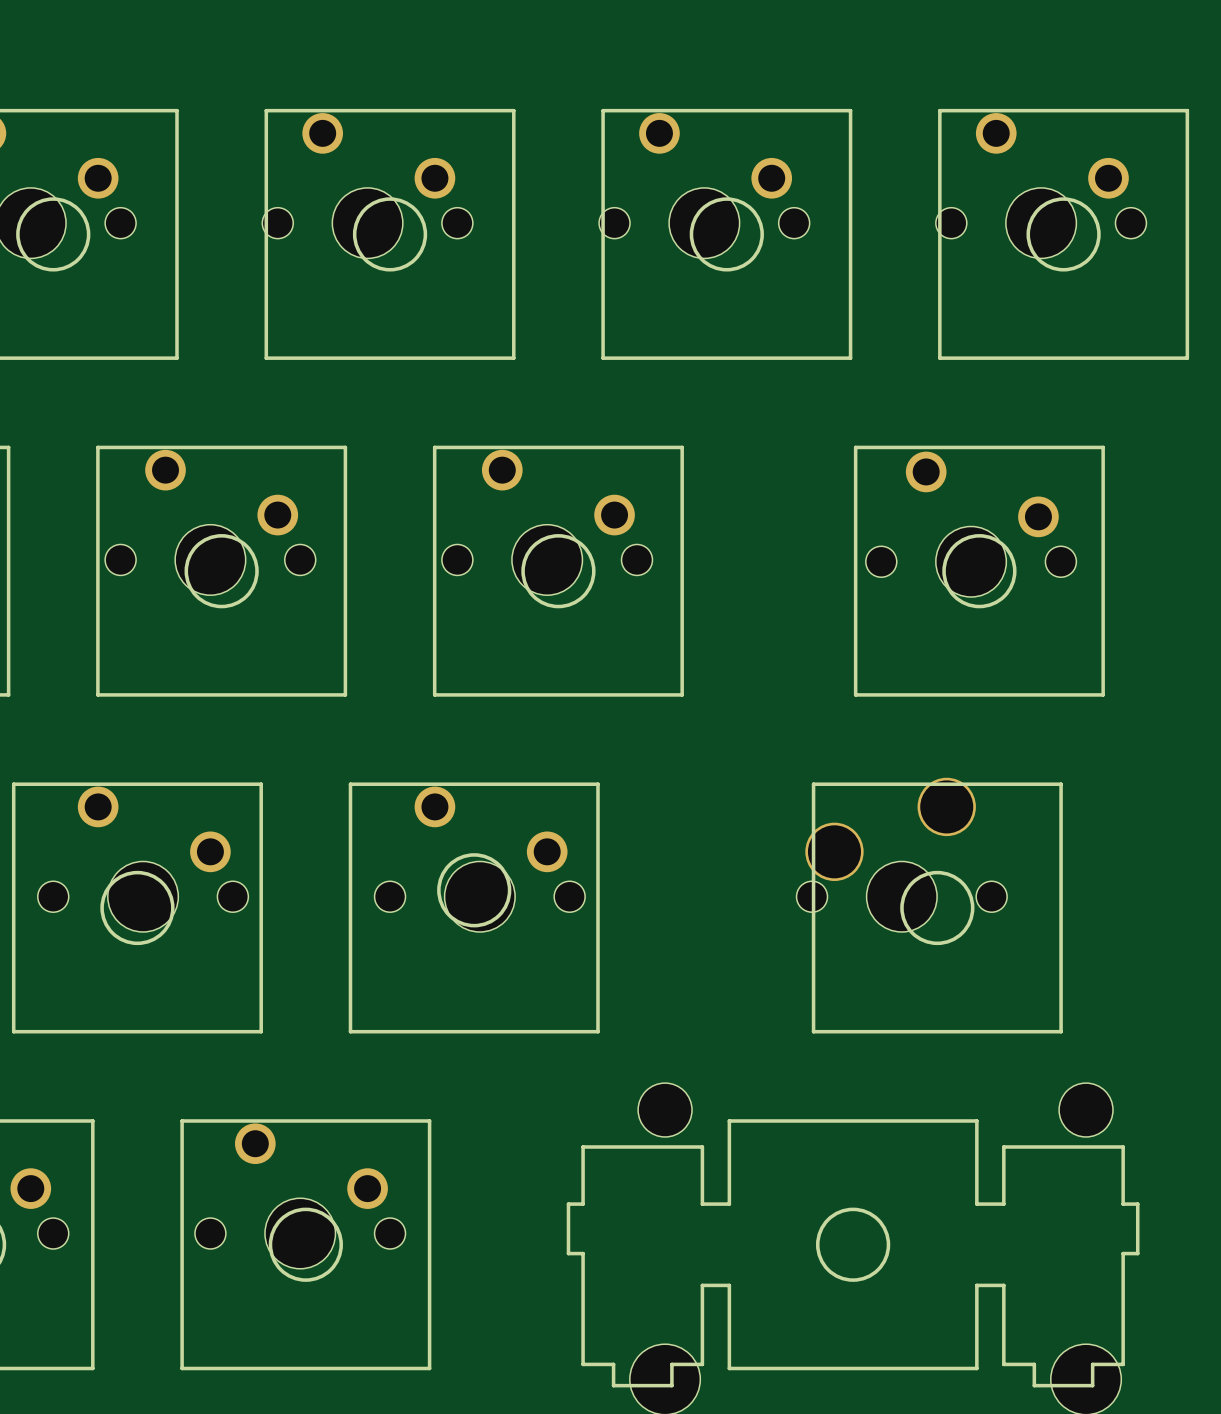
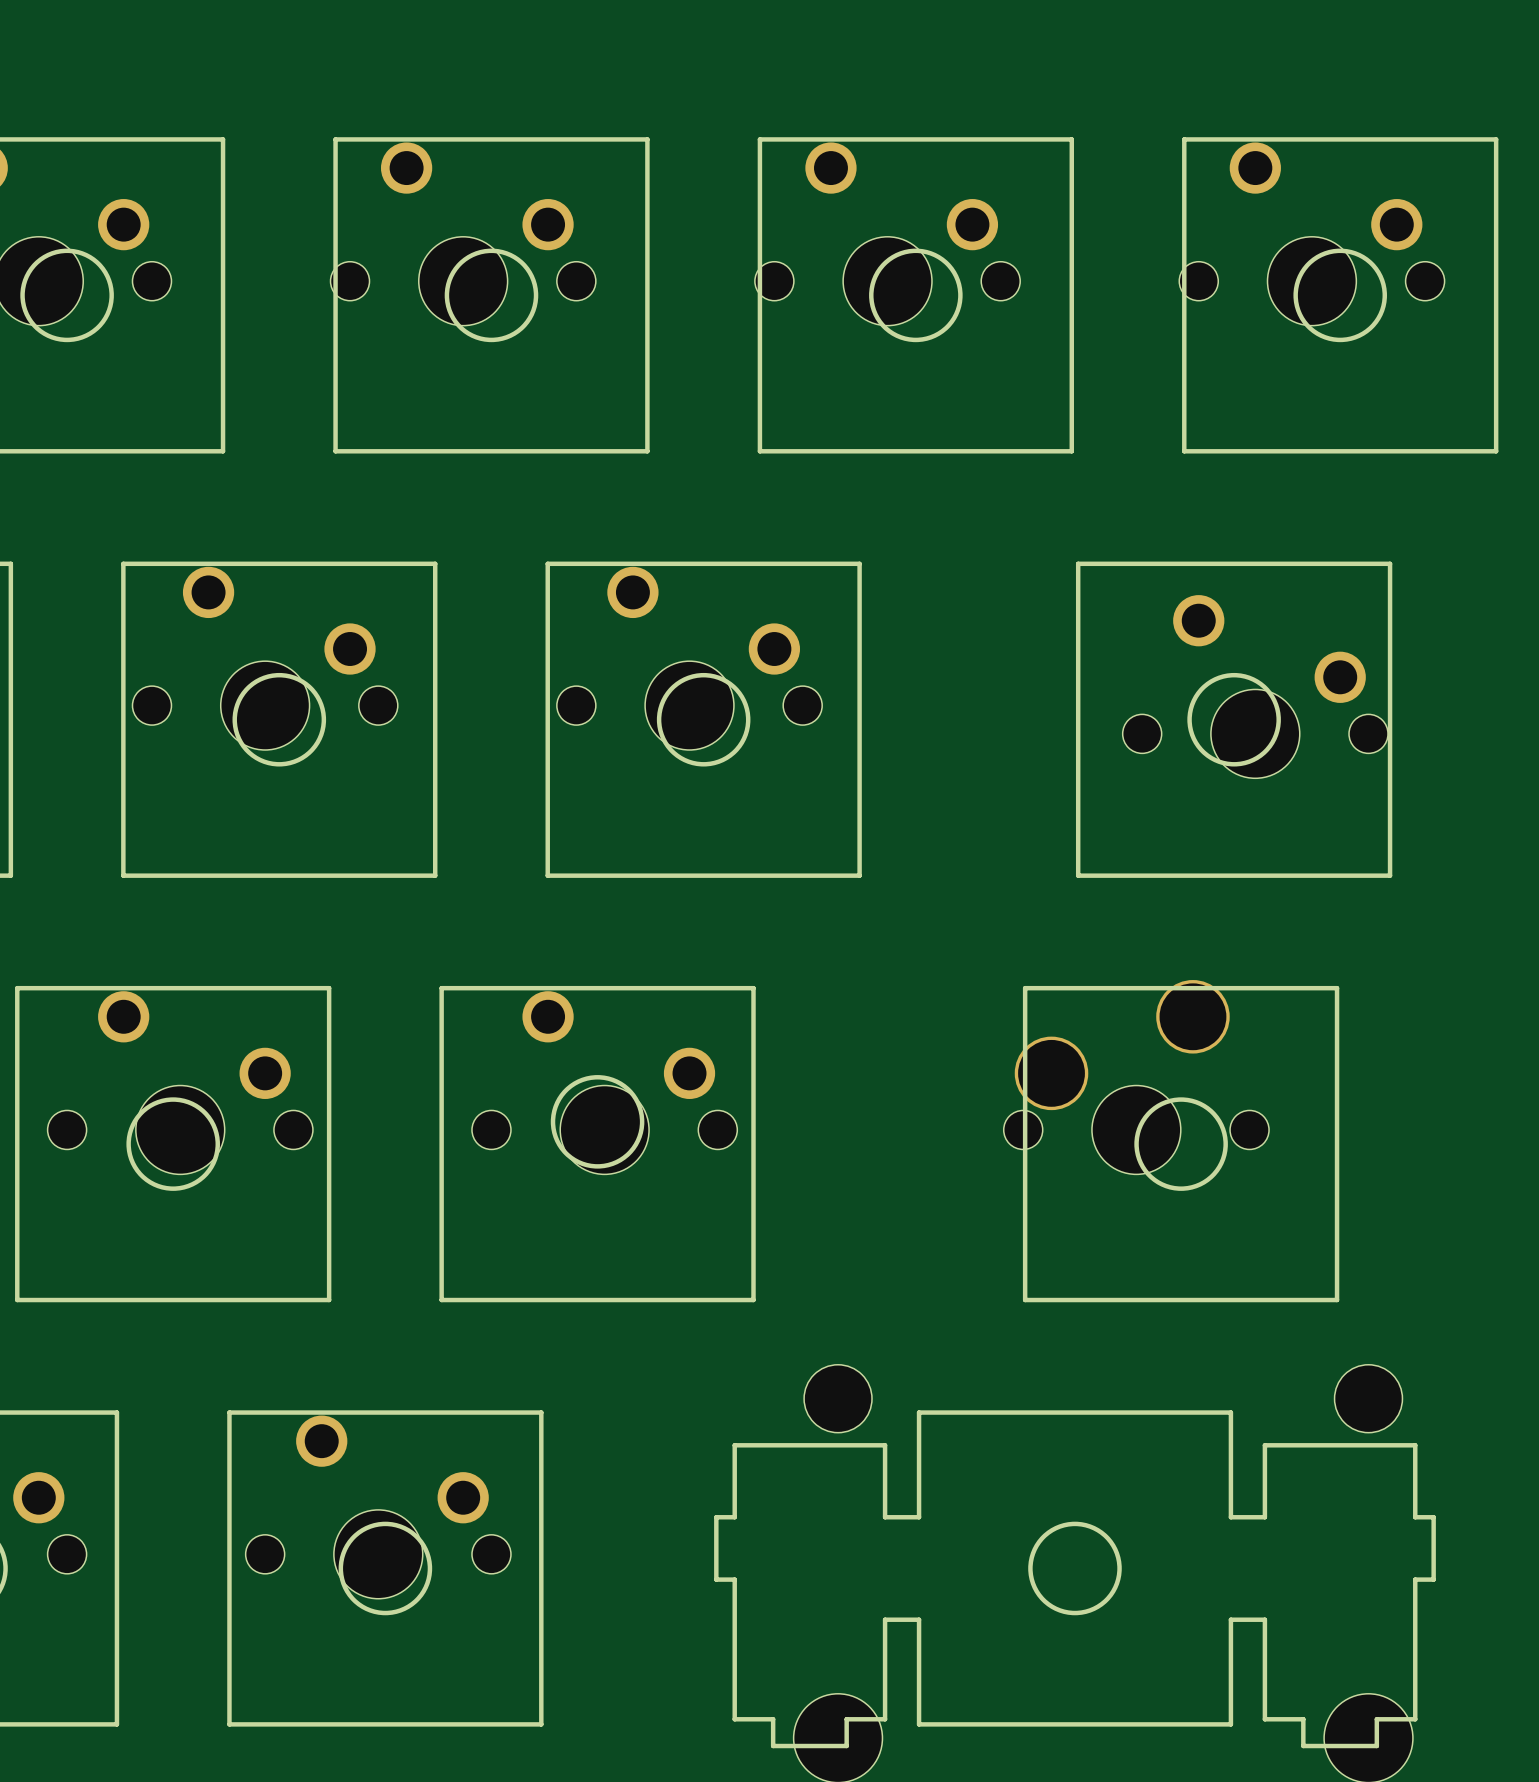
part position: (971, 524) -> (1255, 686)

